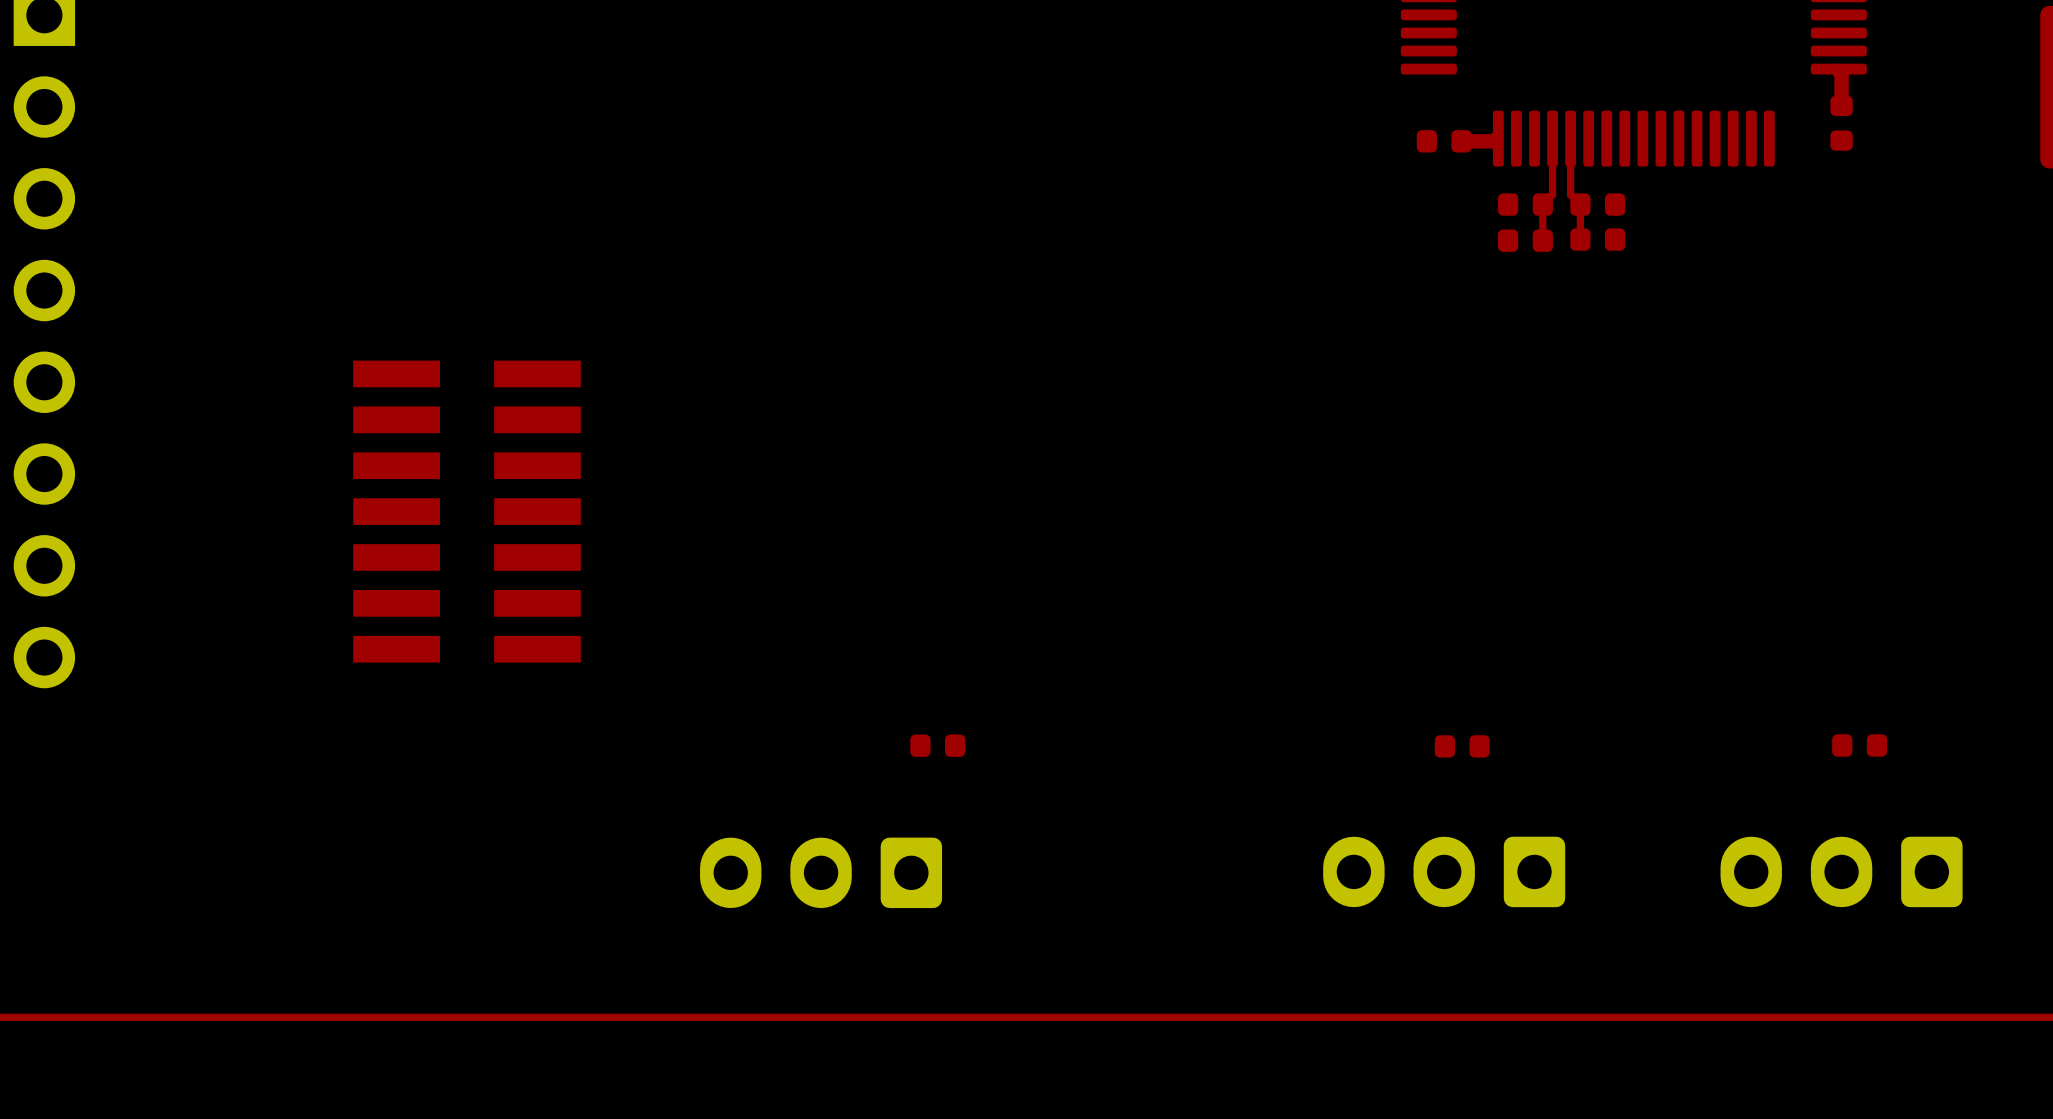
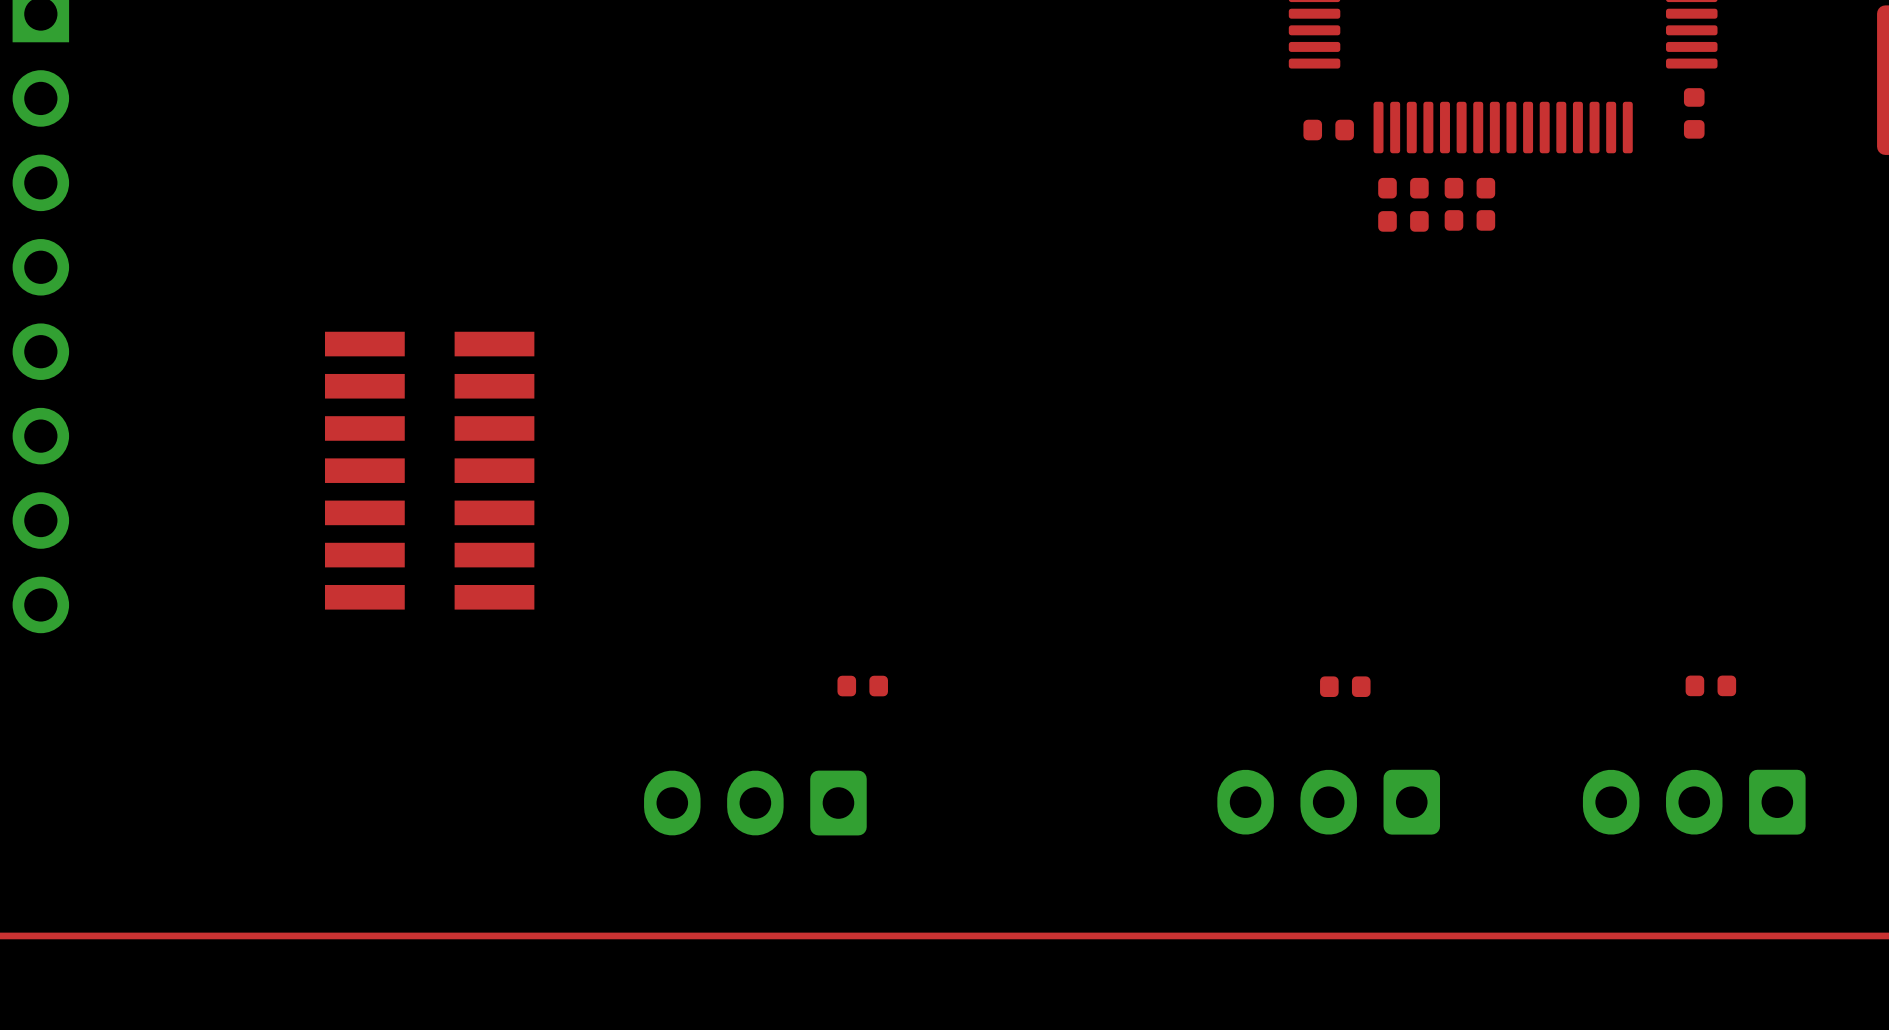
top track: (1838, 70) (1841, 73) (1841, 105) -> none
top track: (1496, 138) (1493, 141) (1461, 141) -> none
top track: (1552, 138) (1552, 194) (1542, 204) (1542, 240) -> none
top track: (1570, 138) (1570, 194) (1580, 204) (1580, 239) -> none

